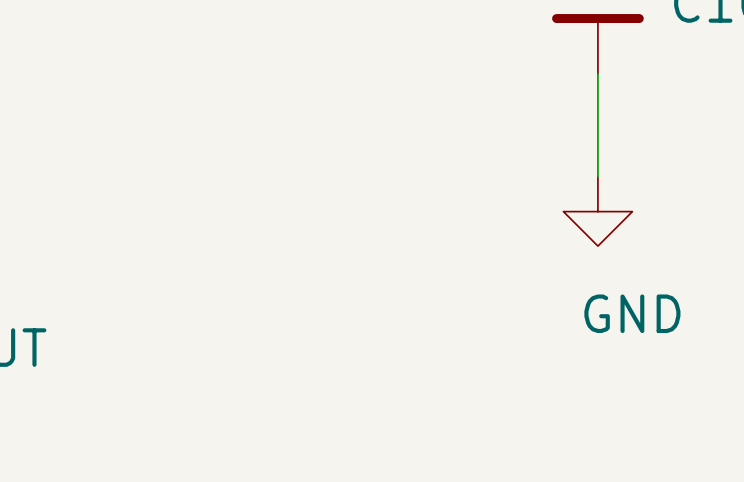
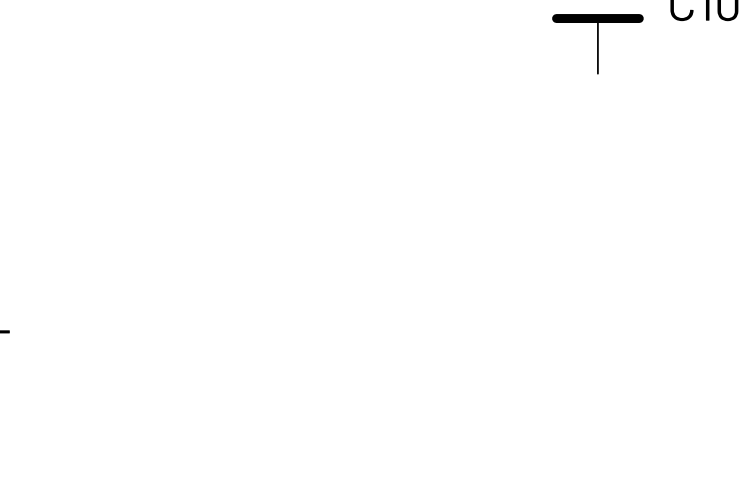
wire: (597, 73) (597, 177) -> none
power symbol: GND (597, 211) -> none

